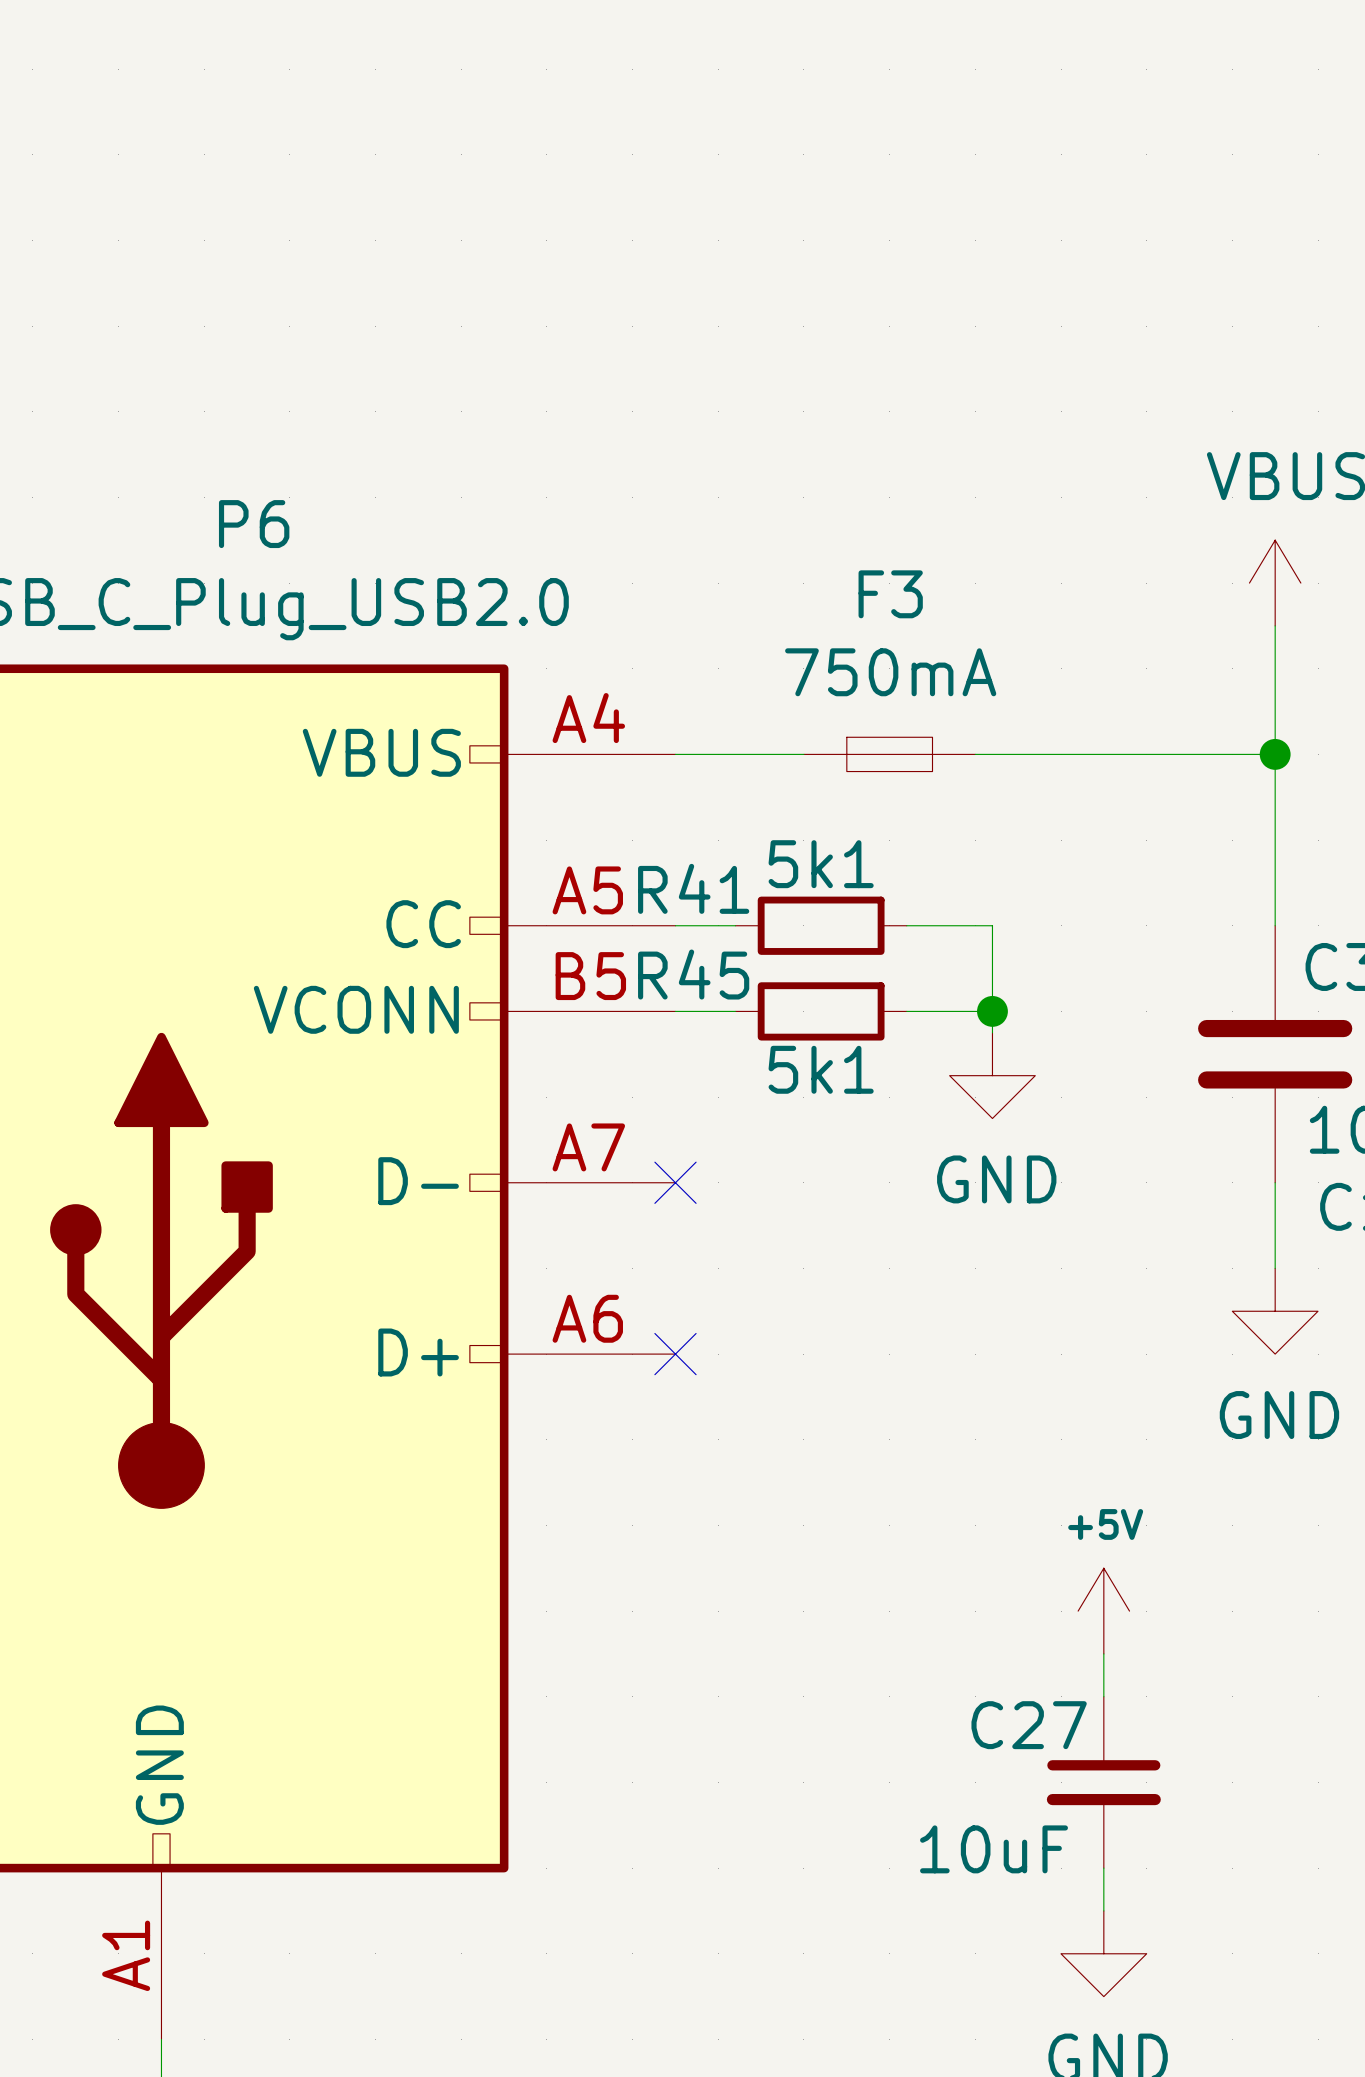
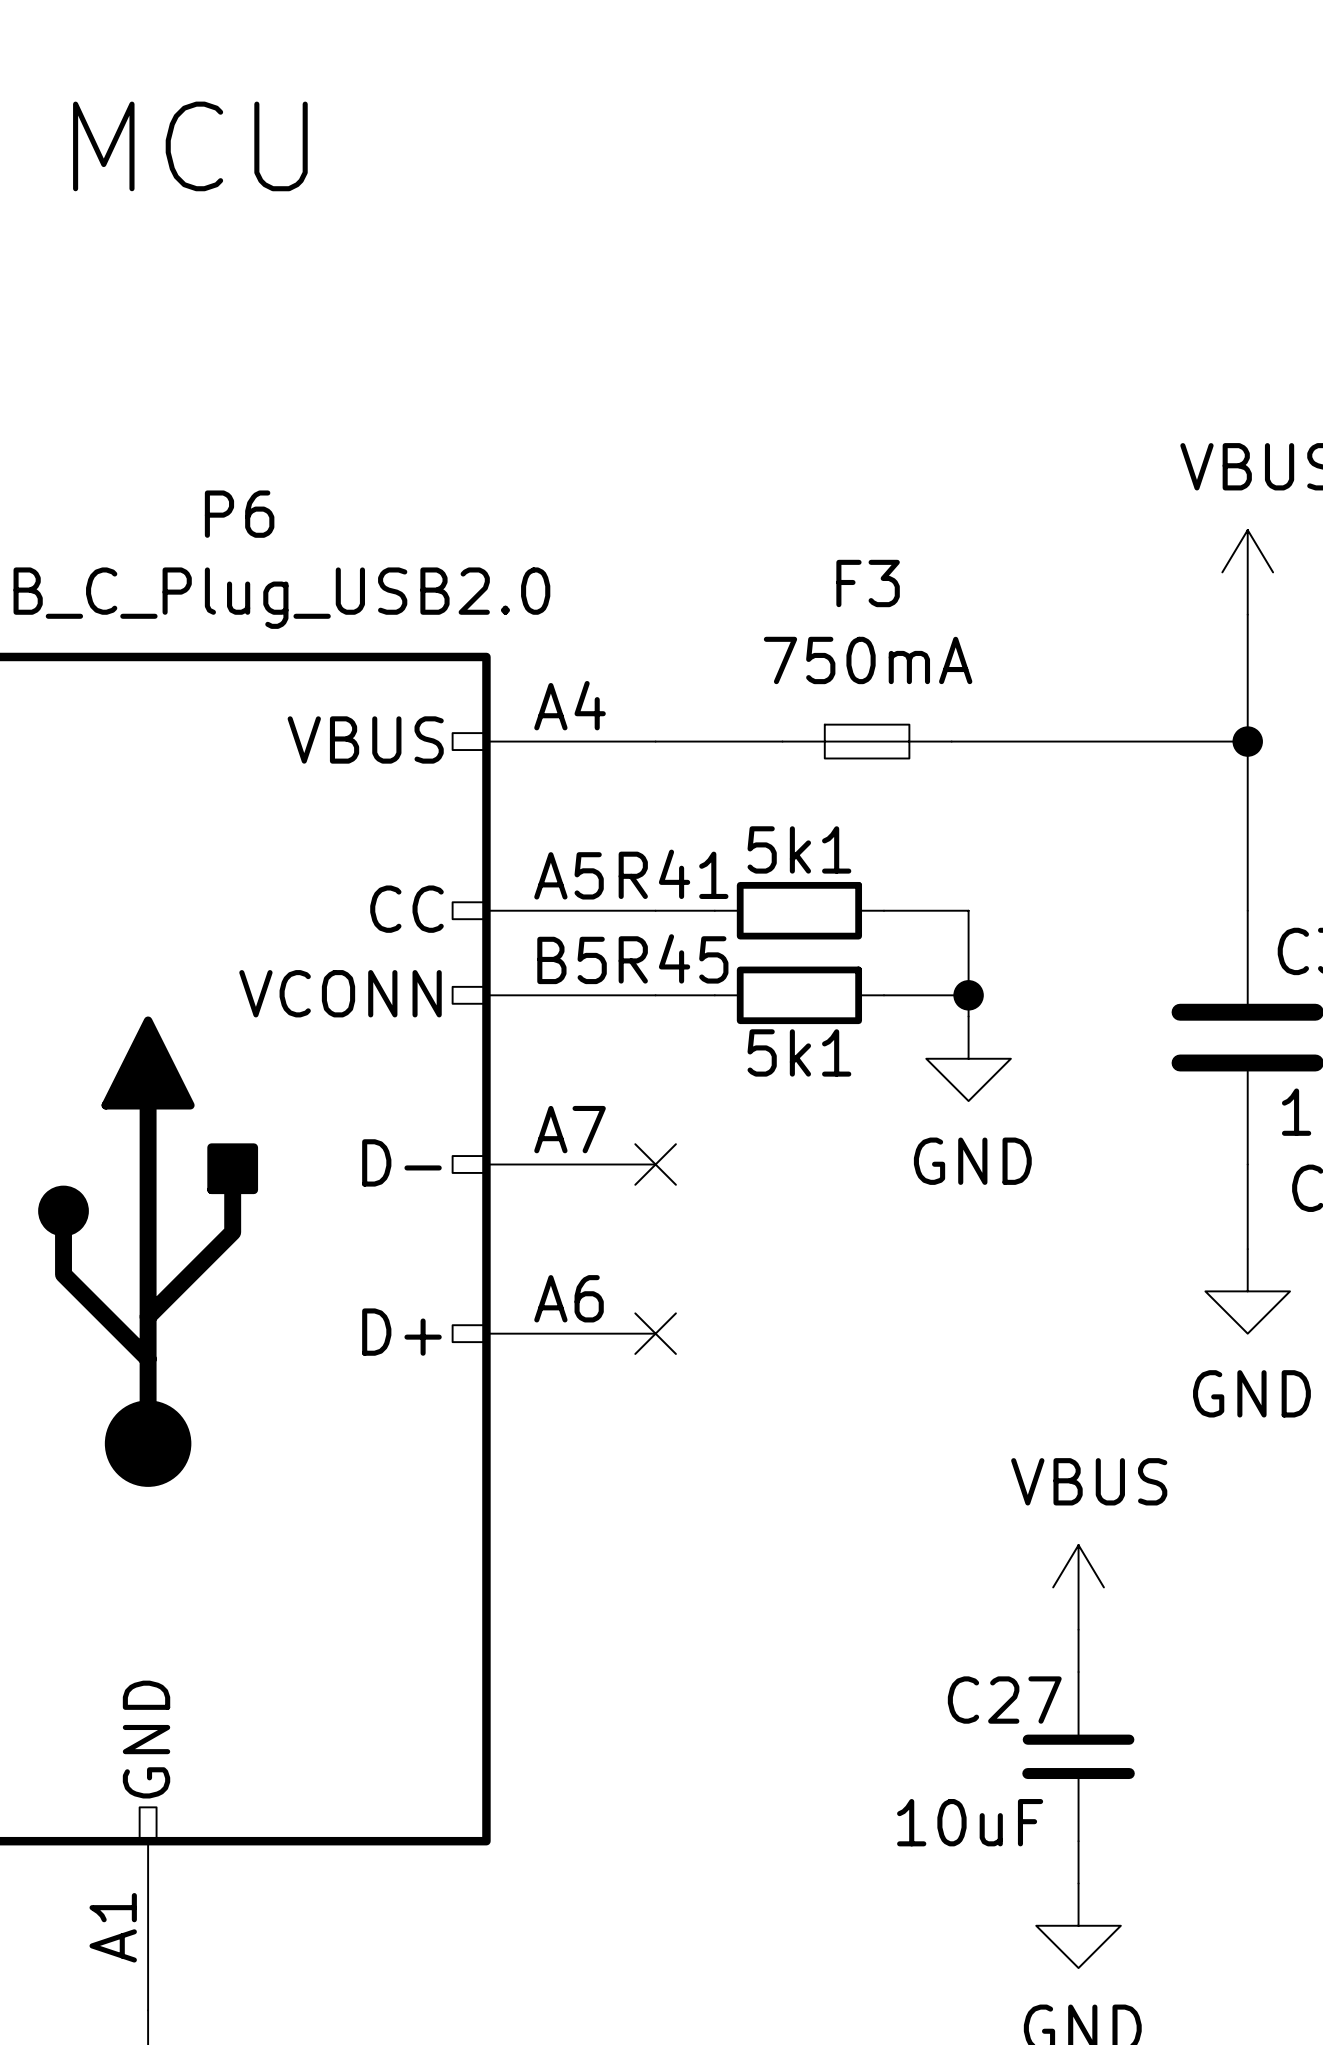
text: none -> MCU (190, 146)
power symbol: +5V (1103, 1611) -> VBUS (1078, 1587)

